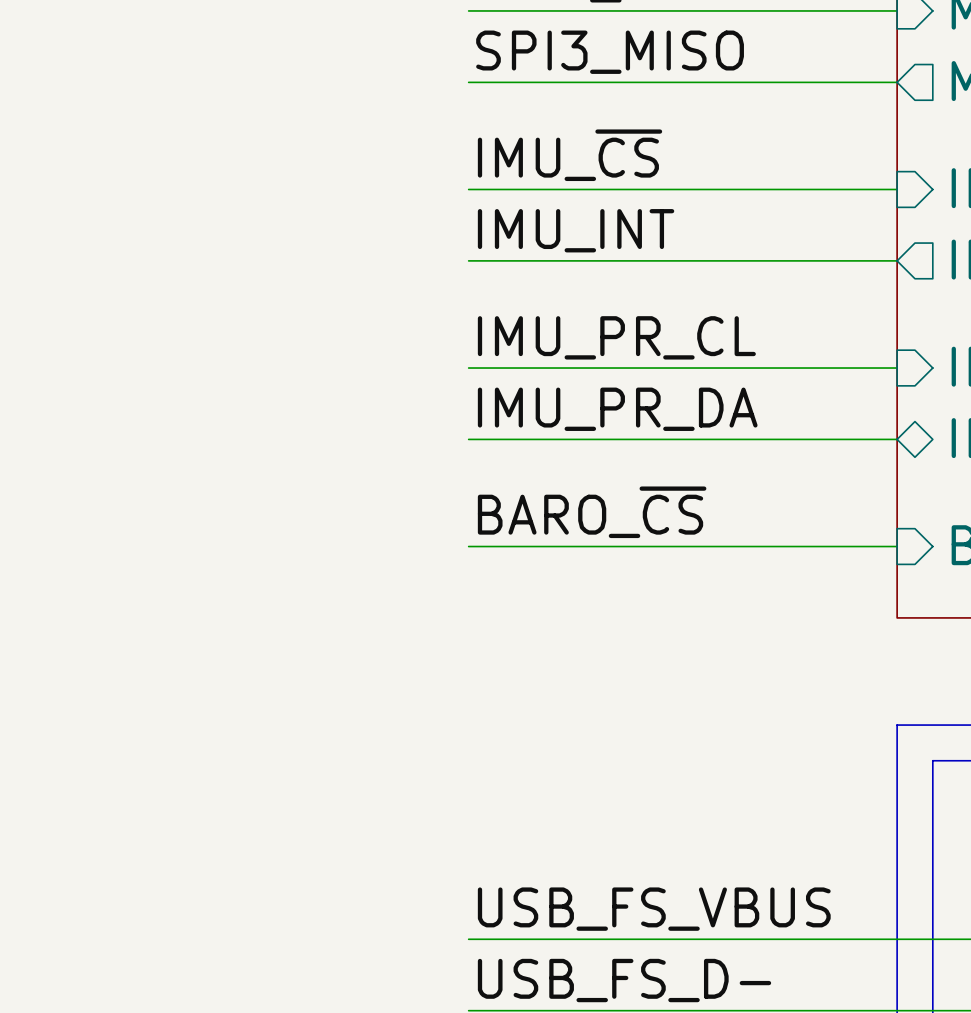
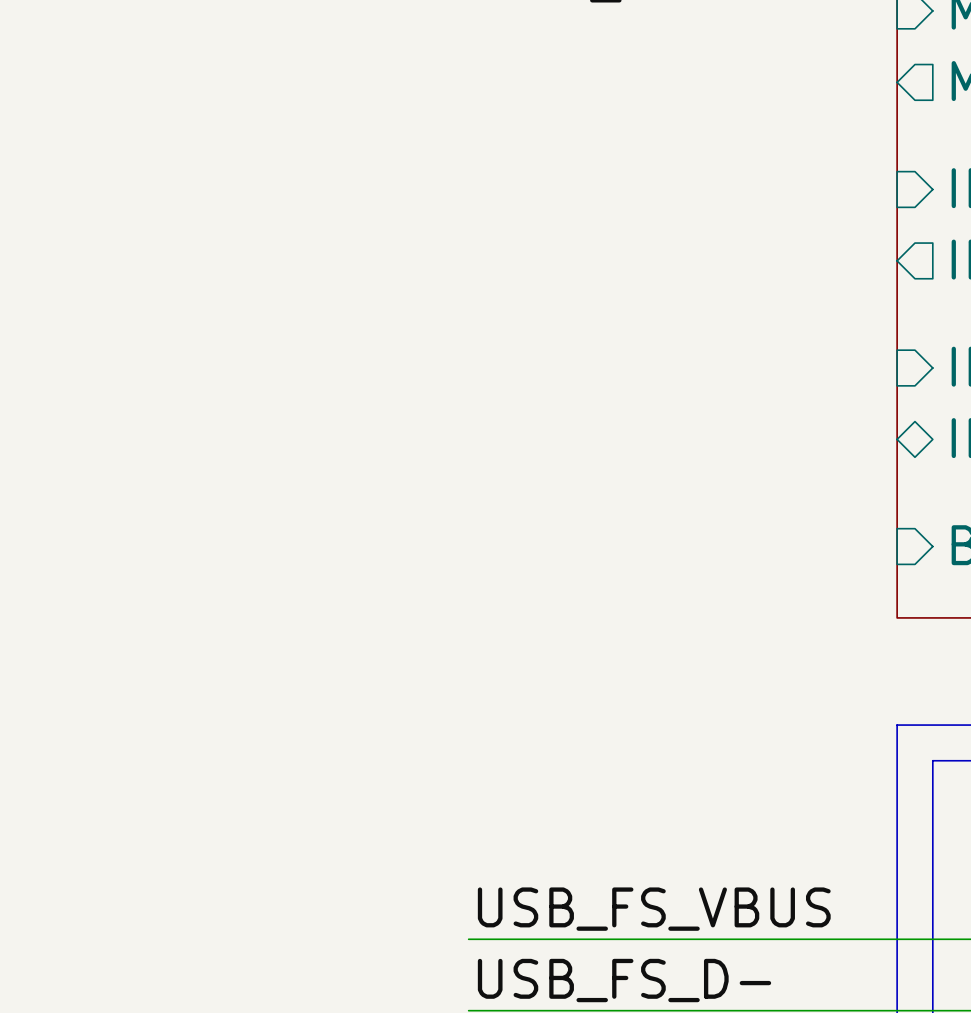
wire: (468, 10) (897, 10) -> none
label: SPI3_MISO (610, 52) -> none
wire: (468, 82) (897, 82) -> none
label: IMU_~{CS} (570, 155) -> none
wire: (468, 189) (897, 189) -> none
label: IMU_INT (576, 230) -> none
wire: (468, 260) (897, 260) -> none
label: IMU_PR_CL (616, 337) -> none
wire: (468, 368) (897, 368) -> none
label: IMU_PR_DA (617, 409) -> none
wire: (468, 439) (897, 439) -> none
label: BARO_~{CS} (592, 512) -> none
wire: (468, 546) (897, 546) -> none

